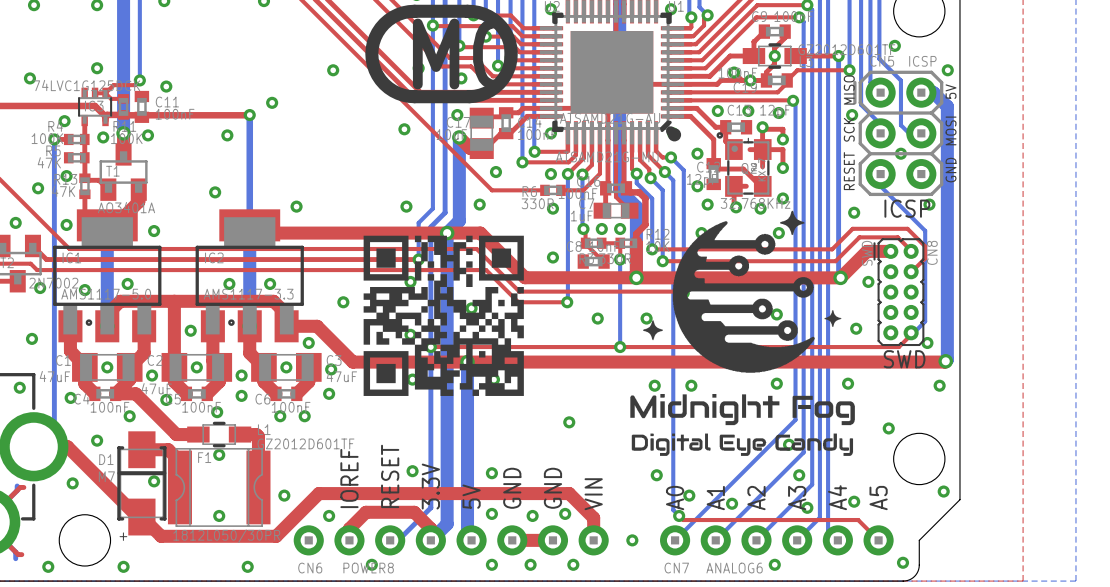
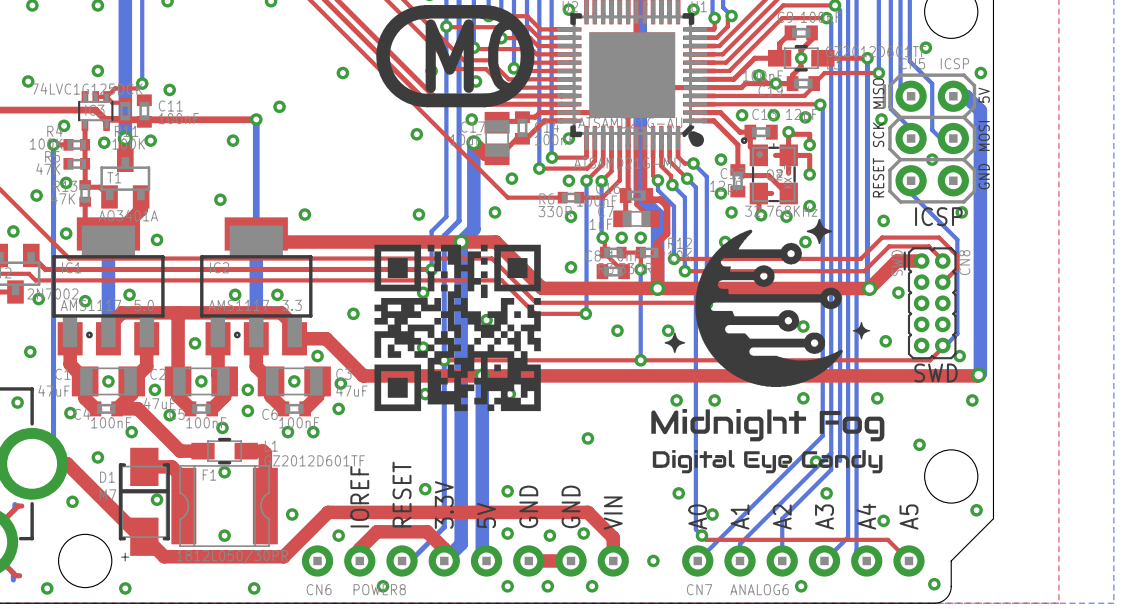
bottom track: none -> (831, 452) (740, 544) (740, 560)
bottom track: (812, 443) (812, 484) (756, 540) -> none
bottom track: (756, 499) (715, 540) -> (782, 518) (782, 560)
via: (732, 503) -> none
via: (807, 507) -> none

